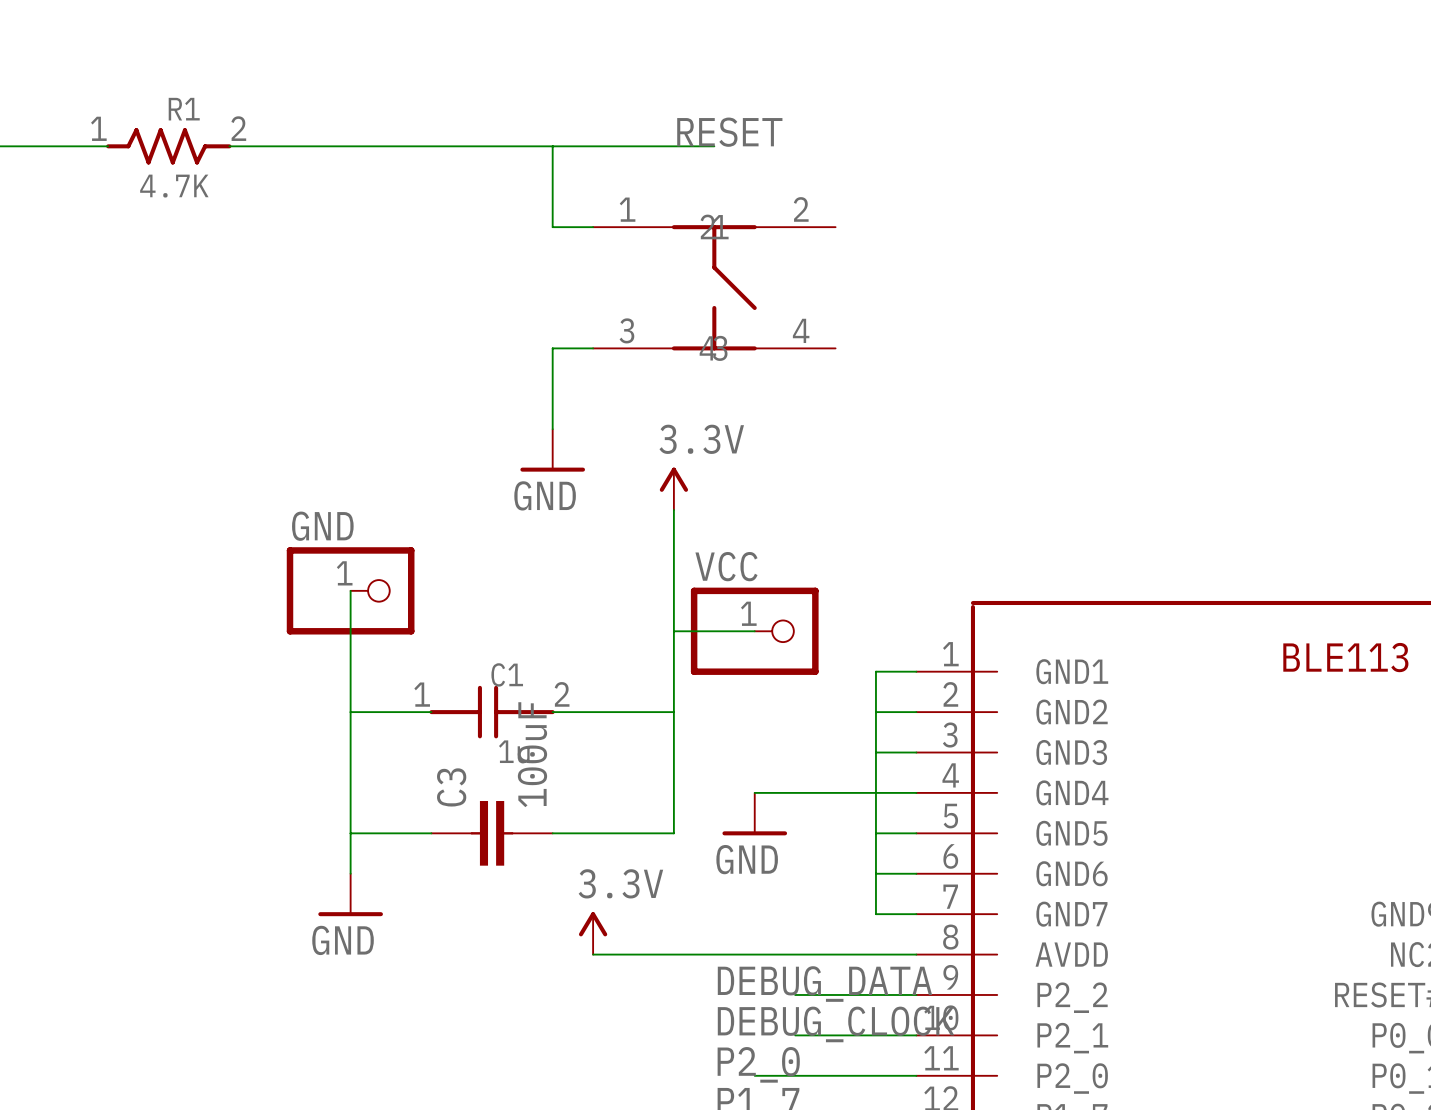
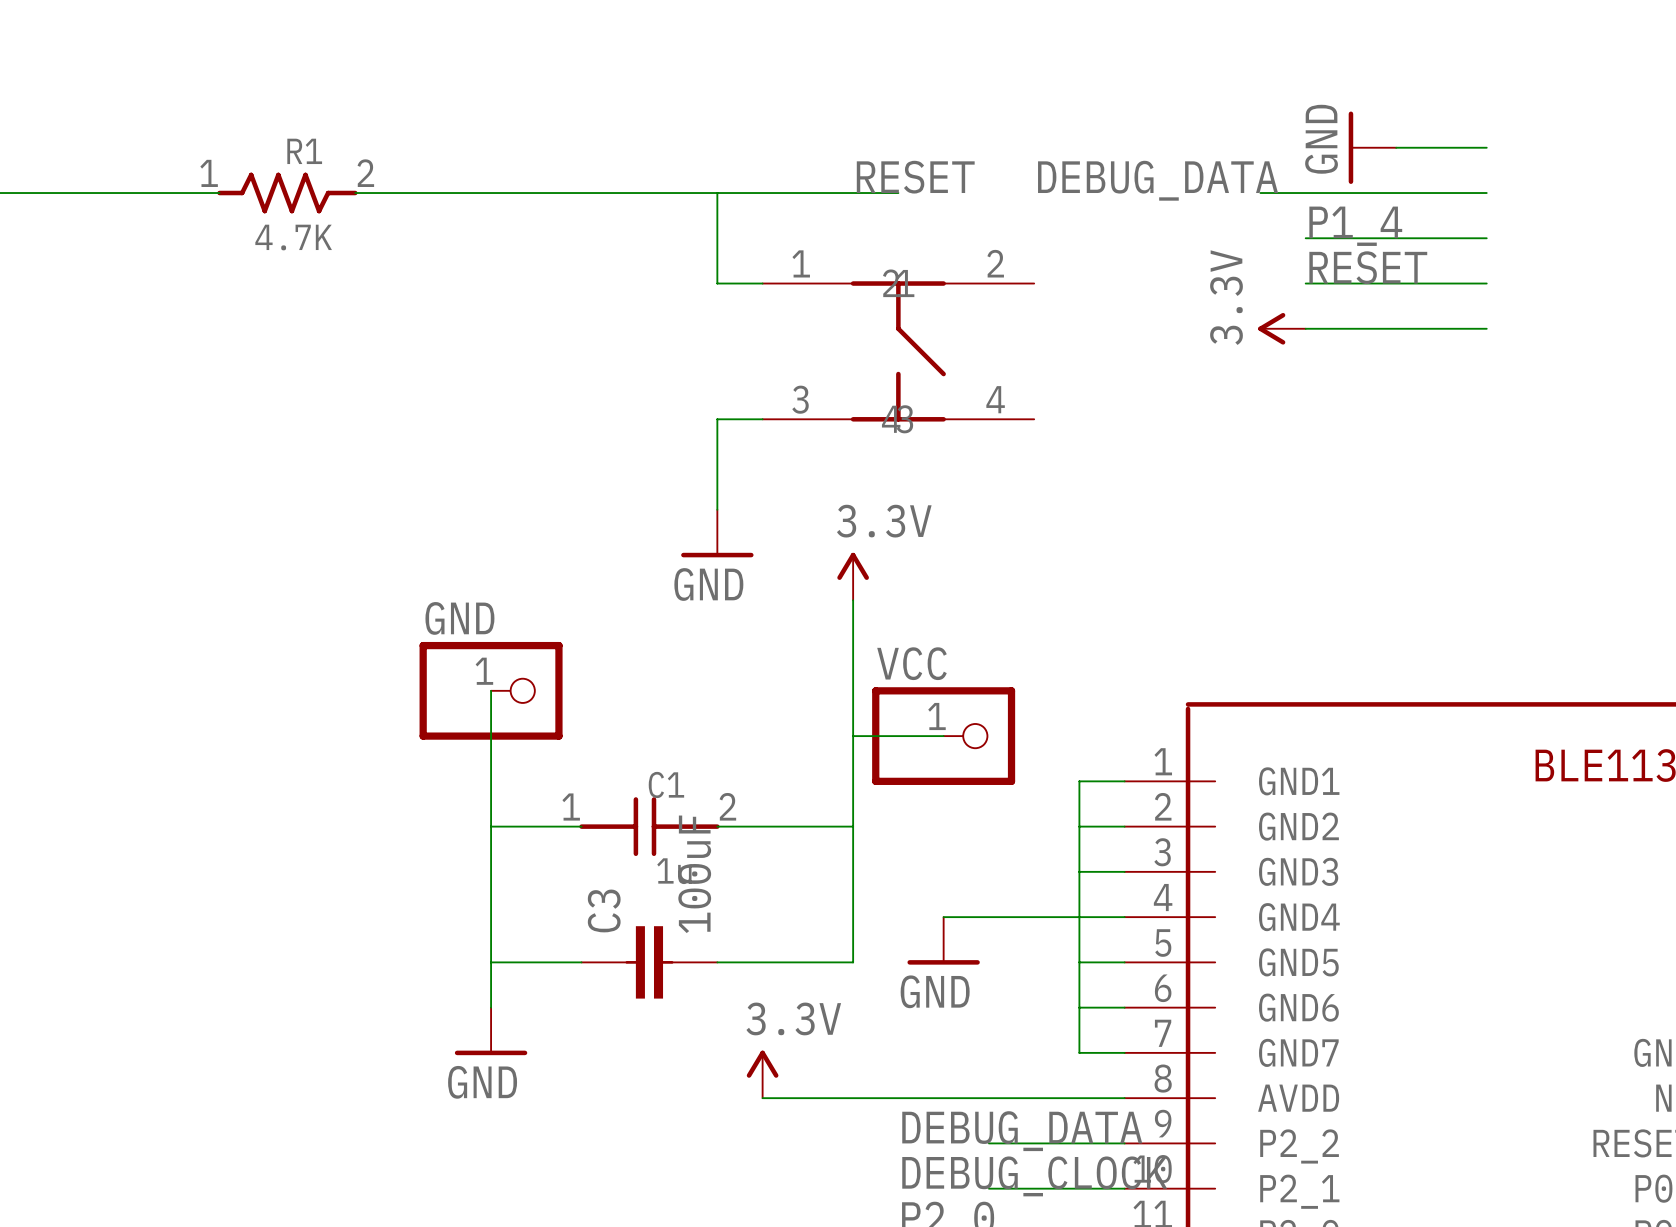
power symbol: none -> GND (1372, 147)
wire: none -> (1396, 147) (1486, 147)
label: none -> DEBUG_DATA (1158, 180)
wire: none -> (1260, 193) (1486, 193)
label: none -> P1_4 (1355, 226)
wire: none -> (1305, 238) (1486, 238)
label: none -> RESET (1368, 267)
wire: none -> (1305, 283) (1486, 283)
power symbol: none -> 3.3V (1281, 328)
wire: none -> (1305, 328) (1486, 328)

